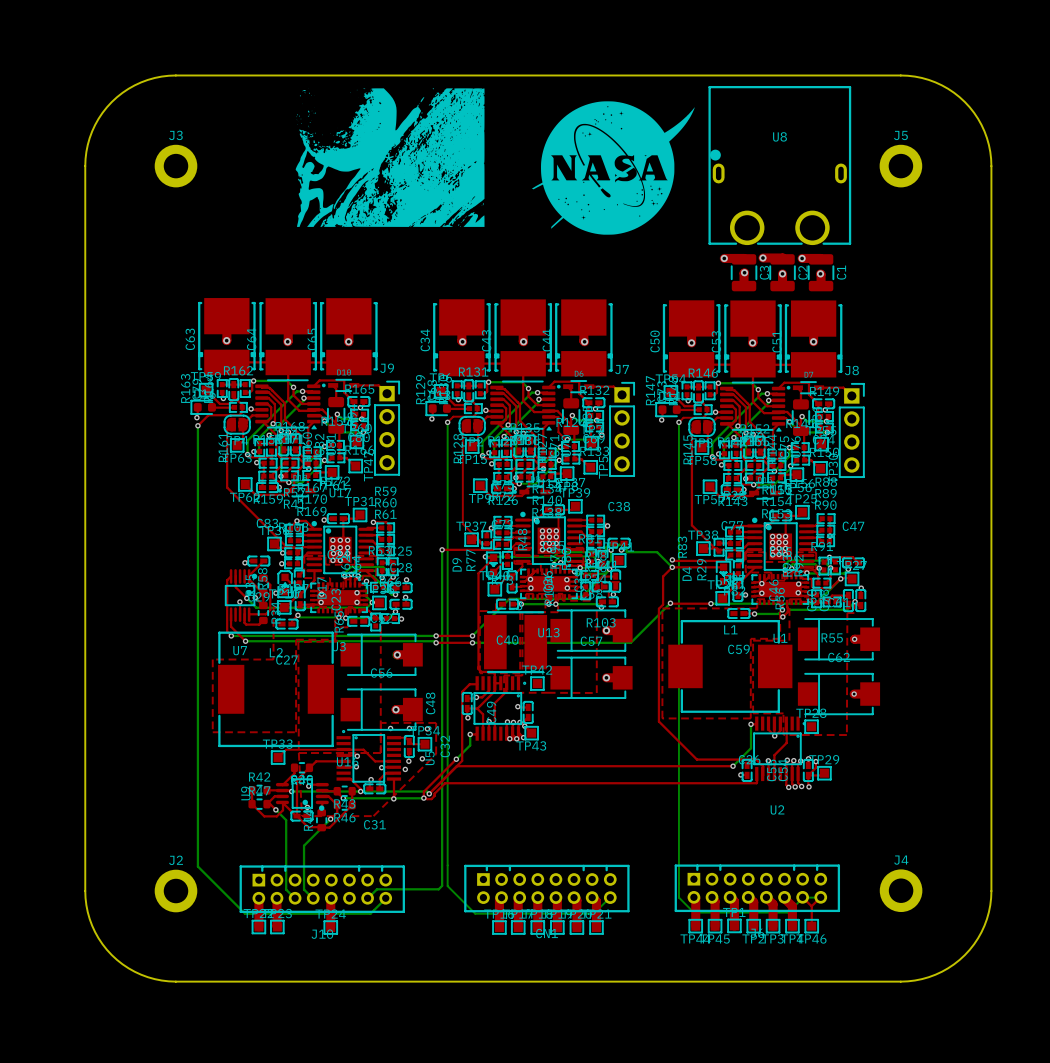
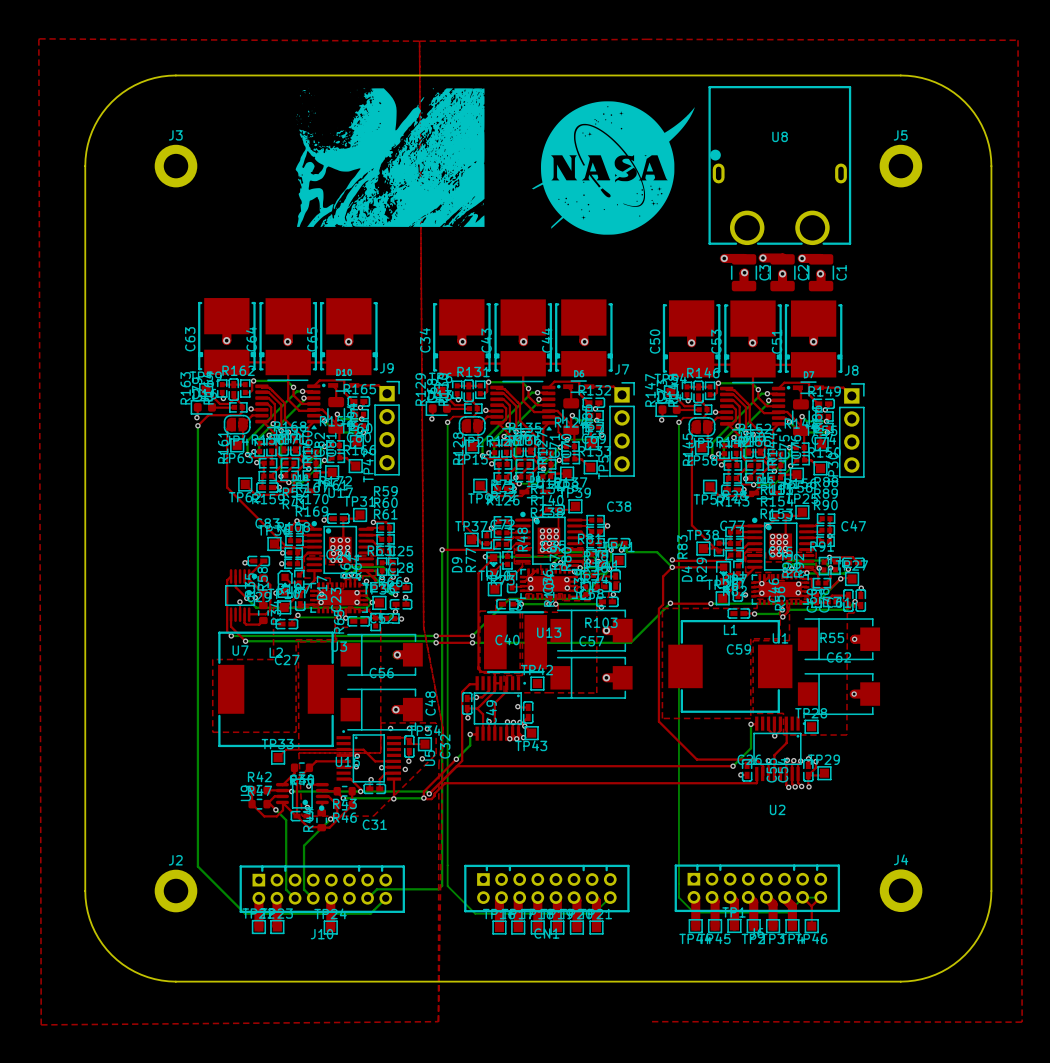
top zone outline: none -> (419, 41) (423, 627) (443, 729)
top zone outline: none -> (419, 41) (38, 39) (41, 1024) (438, 1021)
top zone outline: none -> (419, 41) (1017, 40) (1022, 1022) (652, 1021)
top zone outline: none -> (443, 729) (438, 763) (438, 1021)
top zone outline: none -> (443, 729) (438, 1021)

